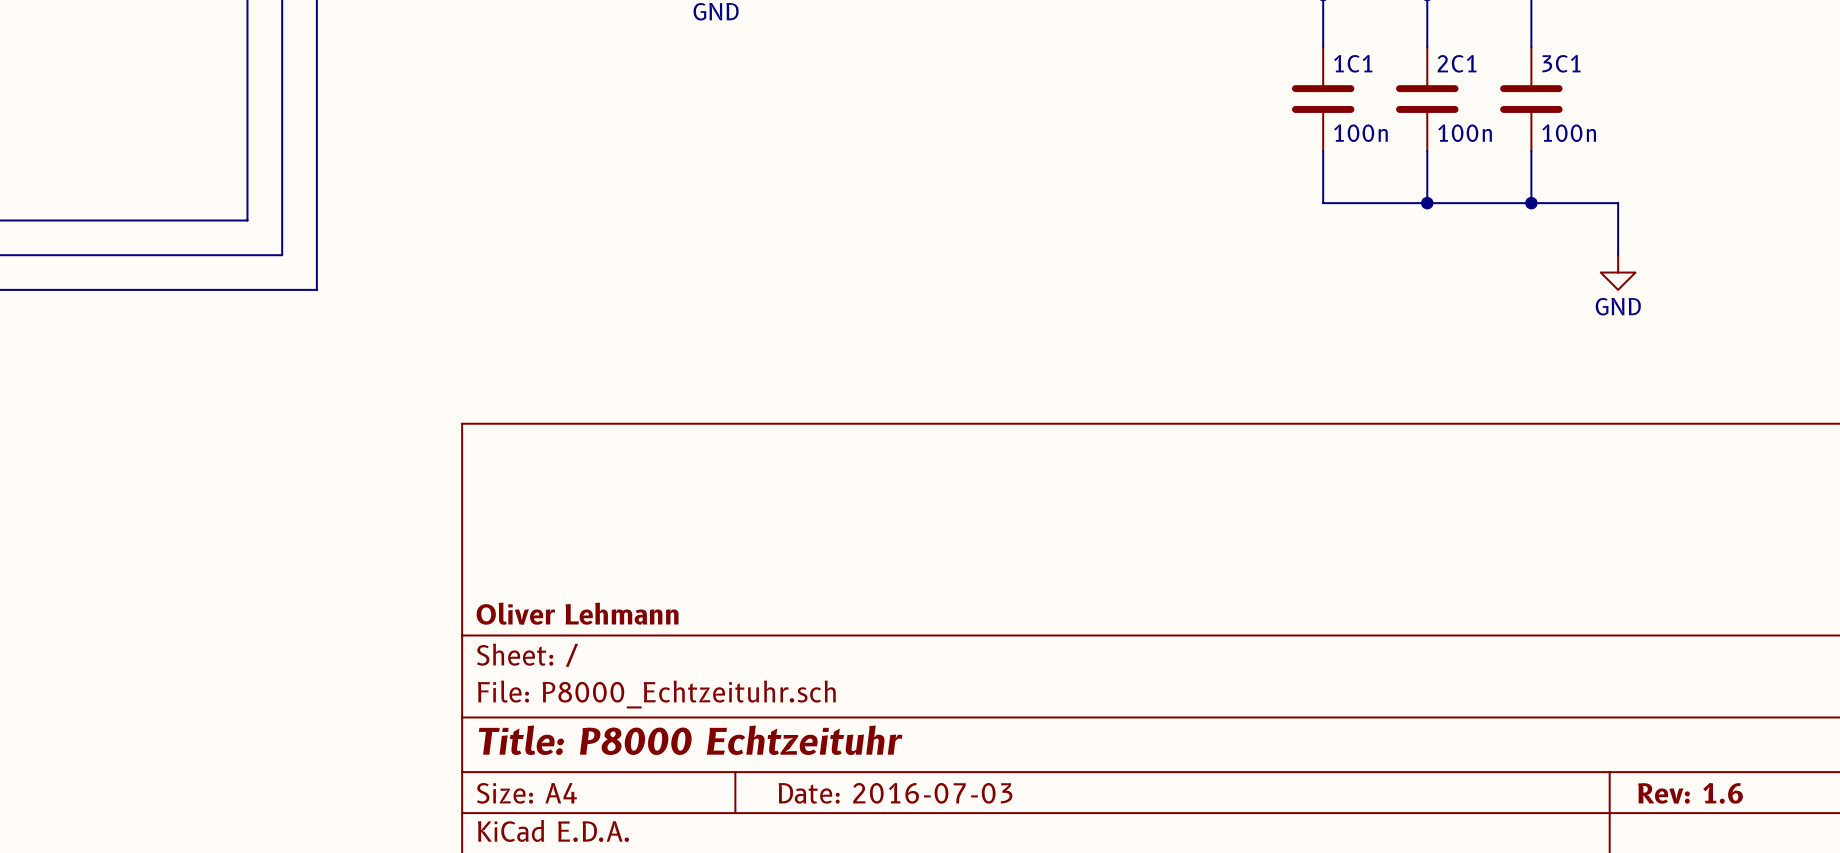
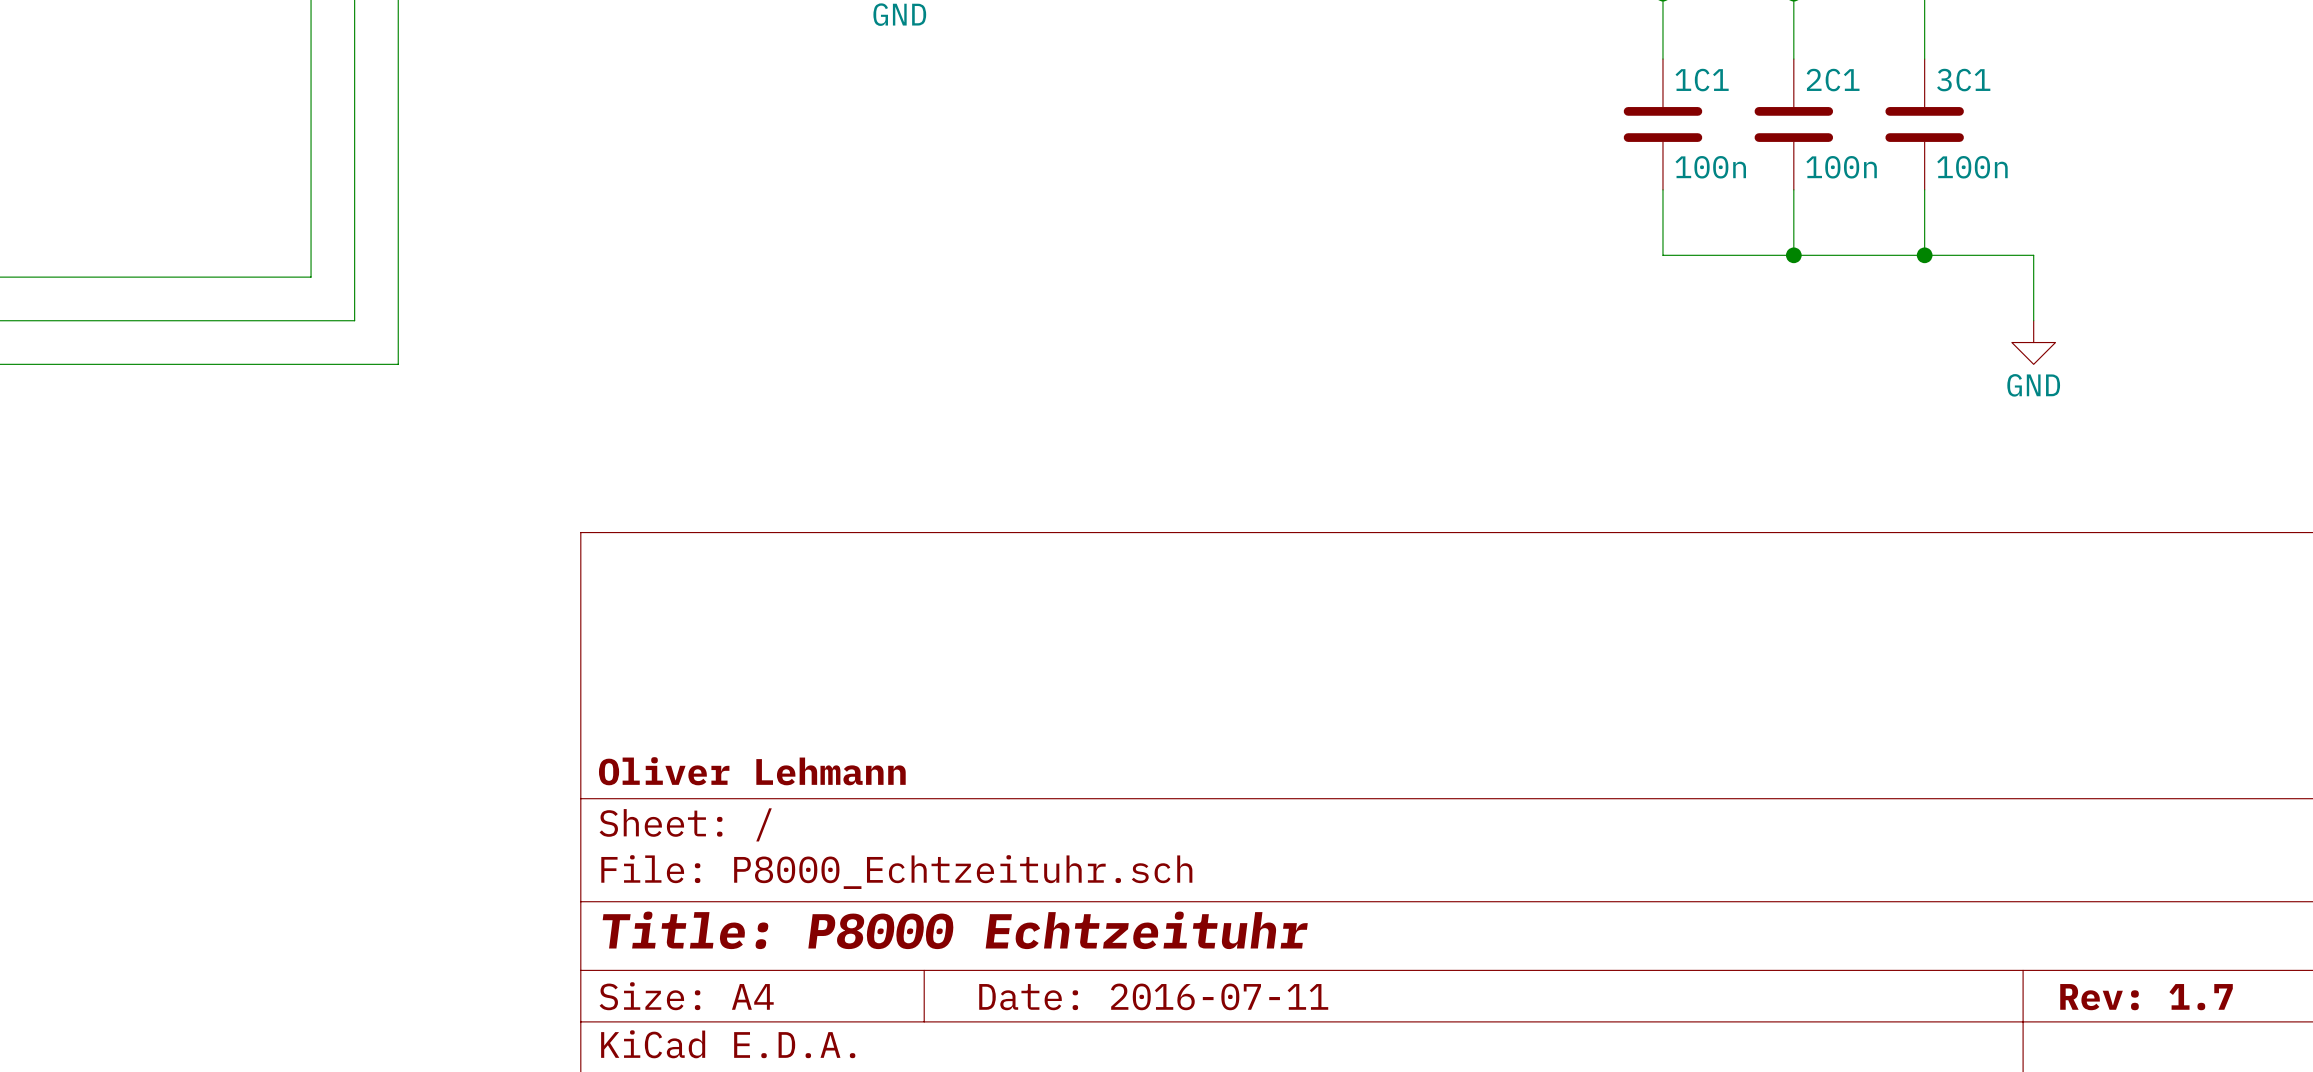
title block: Date: 2016-07-03 (895, 793) -> Date: 2016-07-11 (1153, 996)
title block: Rev: 1.6 (1690, 793) -> Rev: 1.7 (2146, 997)

